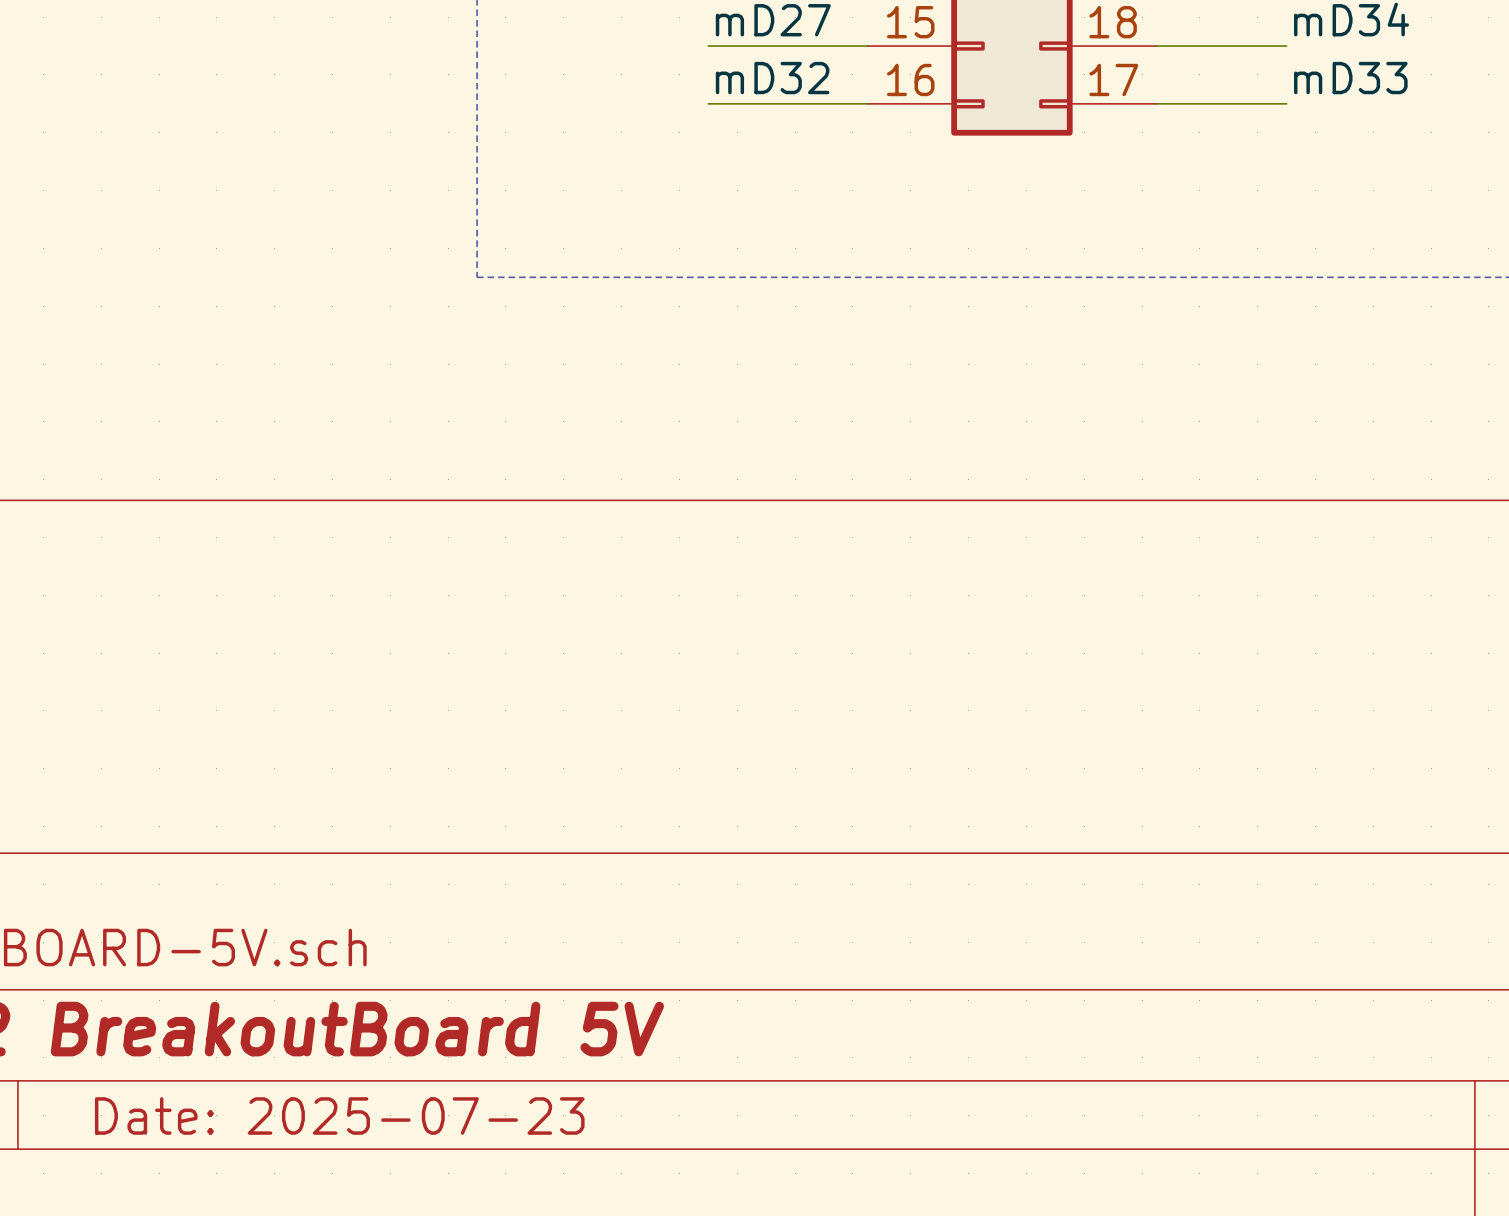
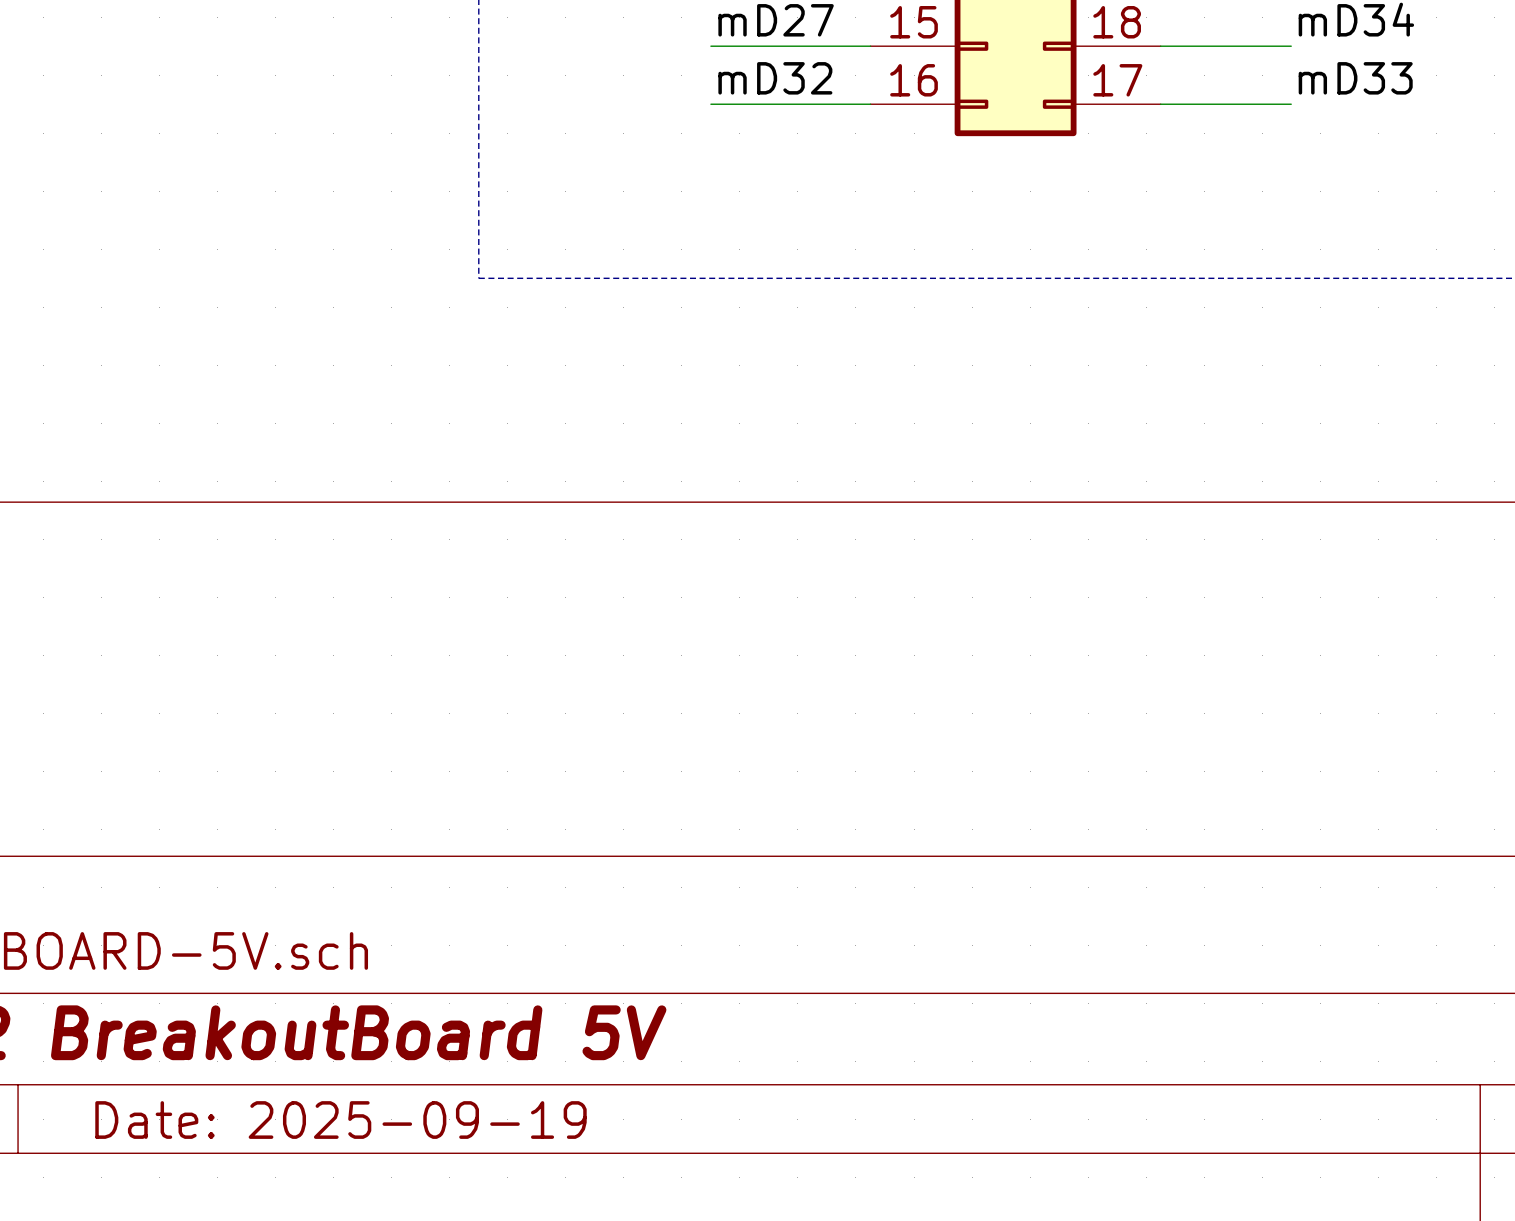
title block: Date: 2025-07-23 (339, 1116) -> Date: 2025-09-19 (340, 1120)

